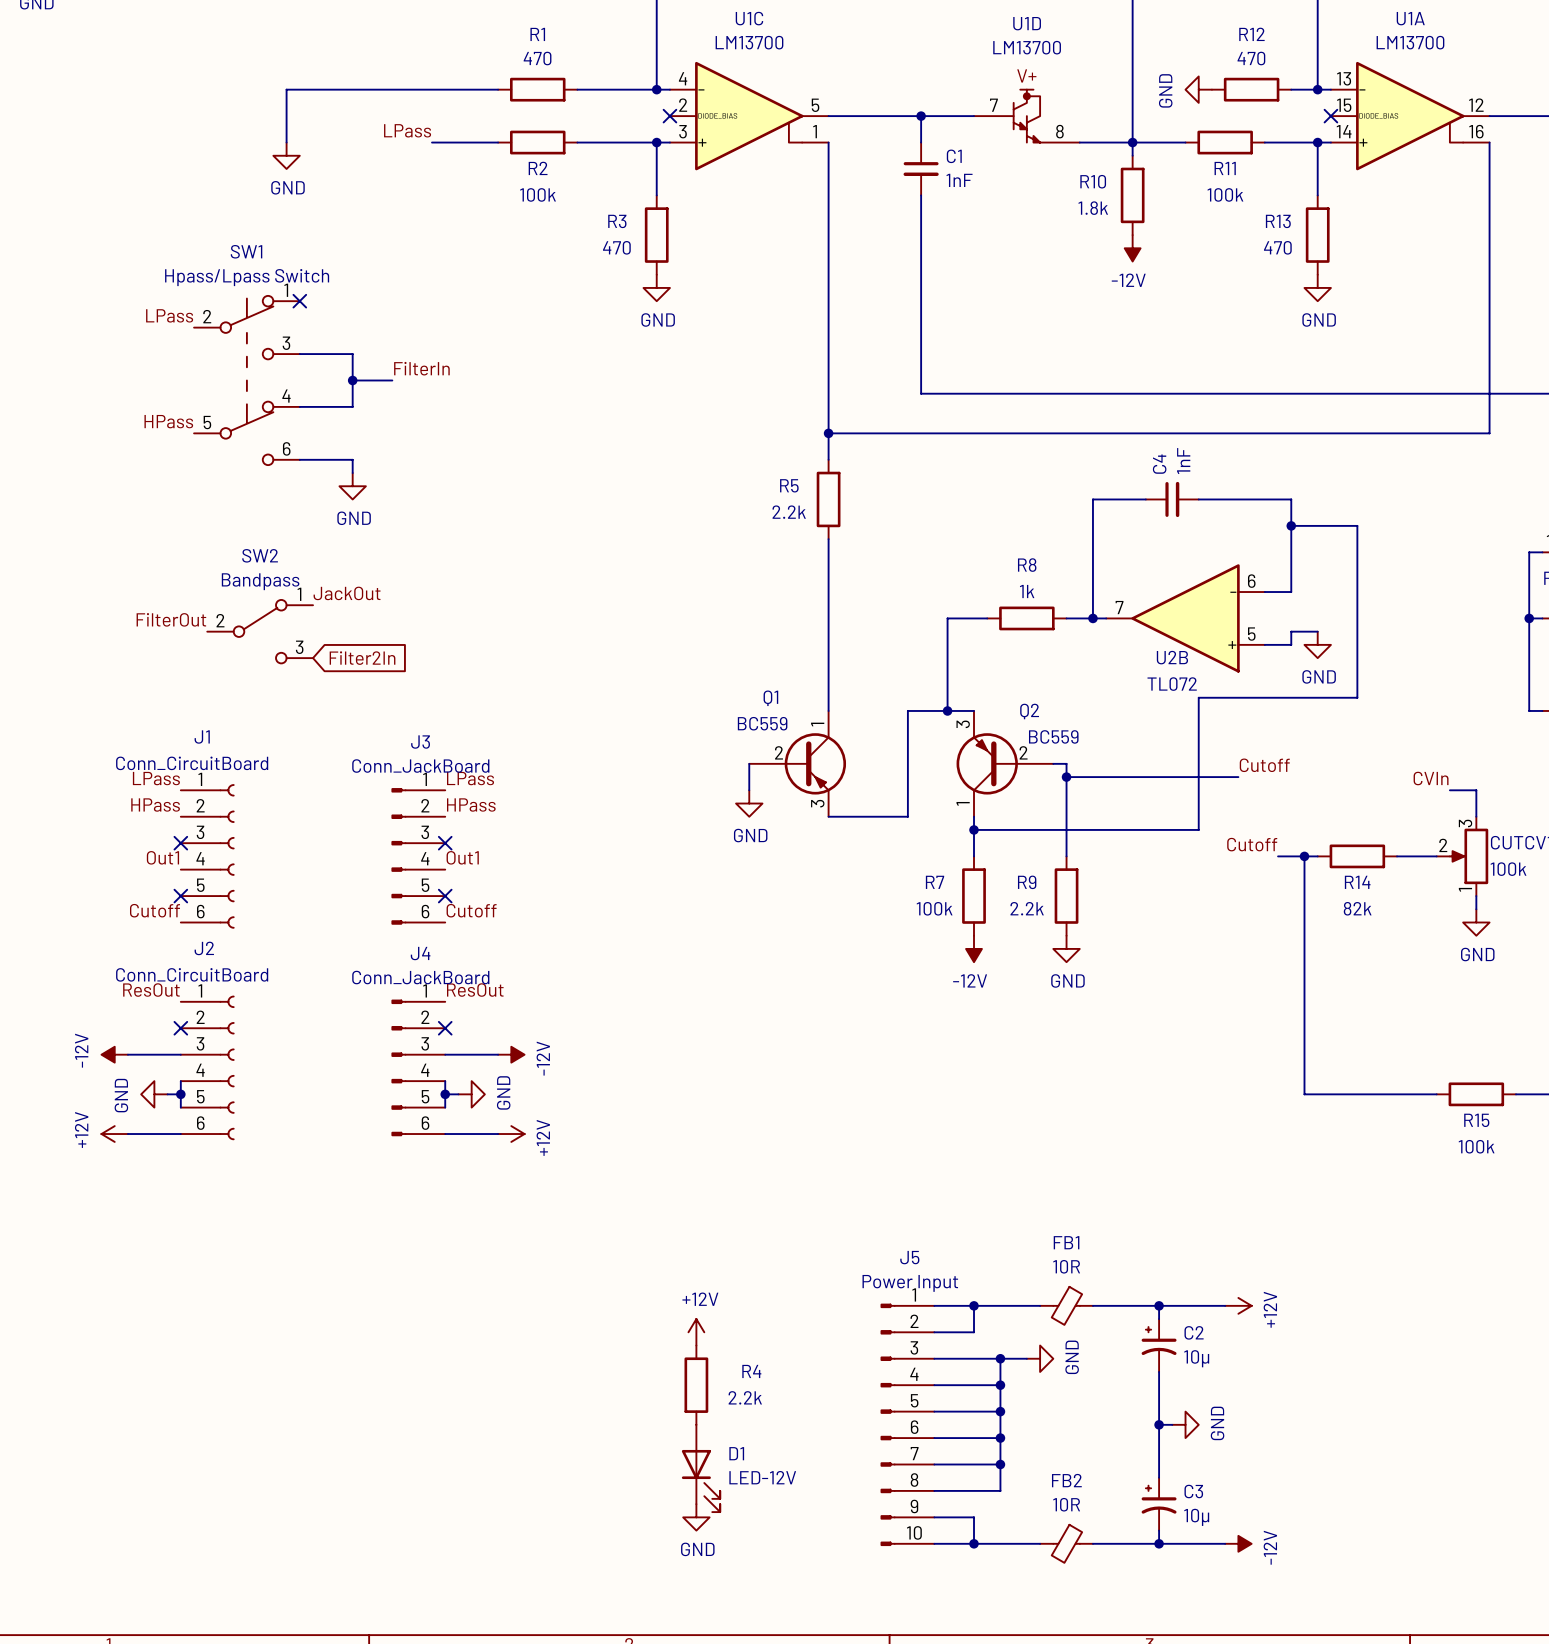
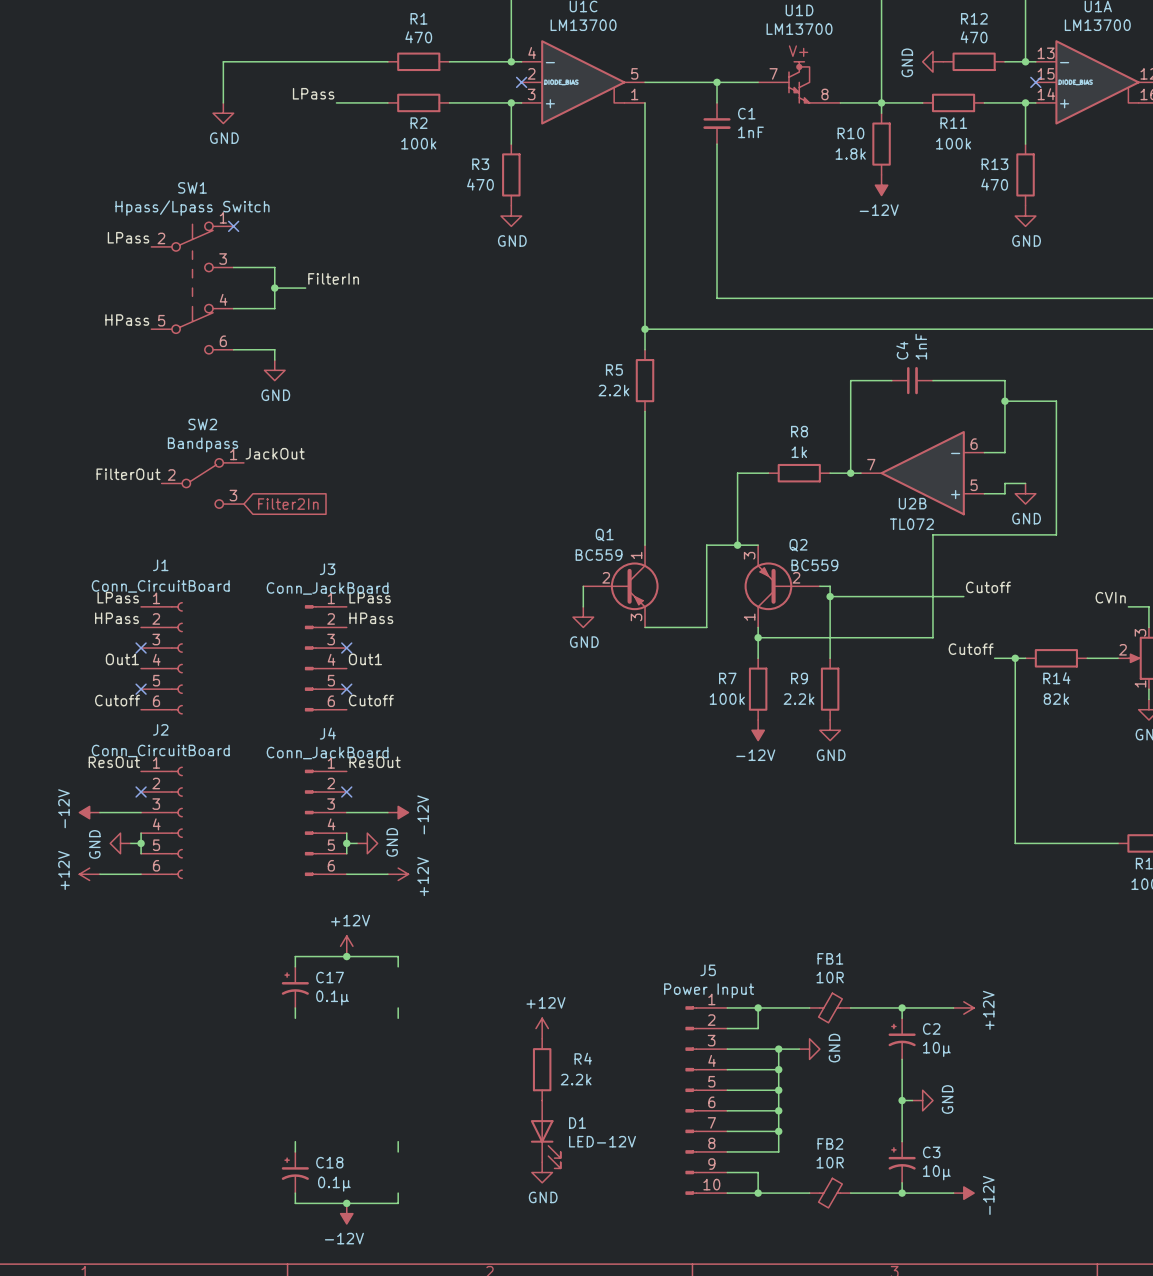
power symbol: none -> +12V (346, 946)
junction: none -> (346, 956)
wire: none -> (295, 966) (295, 956) (398, 956) (398, 966)
C17: none -> 0.1µ (295, 987)
wire: none -> (295, 1007) (295, 1018)
wire: none -> (398, 1007) (398, 1018)
wire: none -> (295, 1141) (295, 1151)
wire: none -> (398, 1141) (398, 1151)
C18: none -> 0.1µ (295, 1172)
wire: none -> (295, 1193) (295, 1203) (398, 1203) (398, 1193)
junction: none -> (346, 1203)
power symbol: none -> -12V (346, 1213)

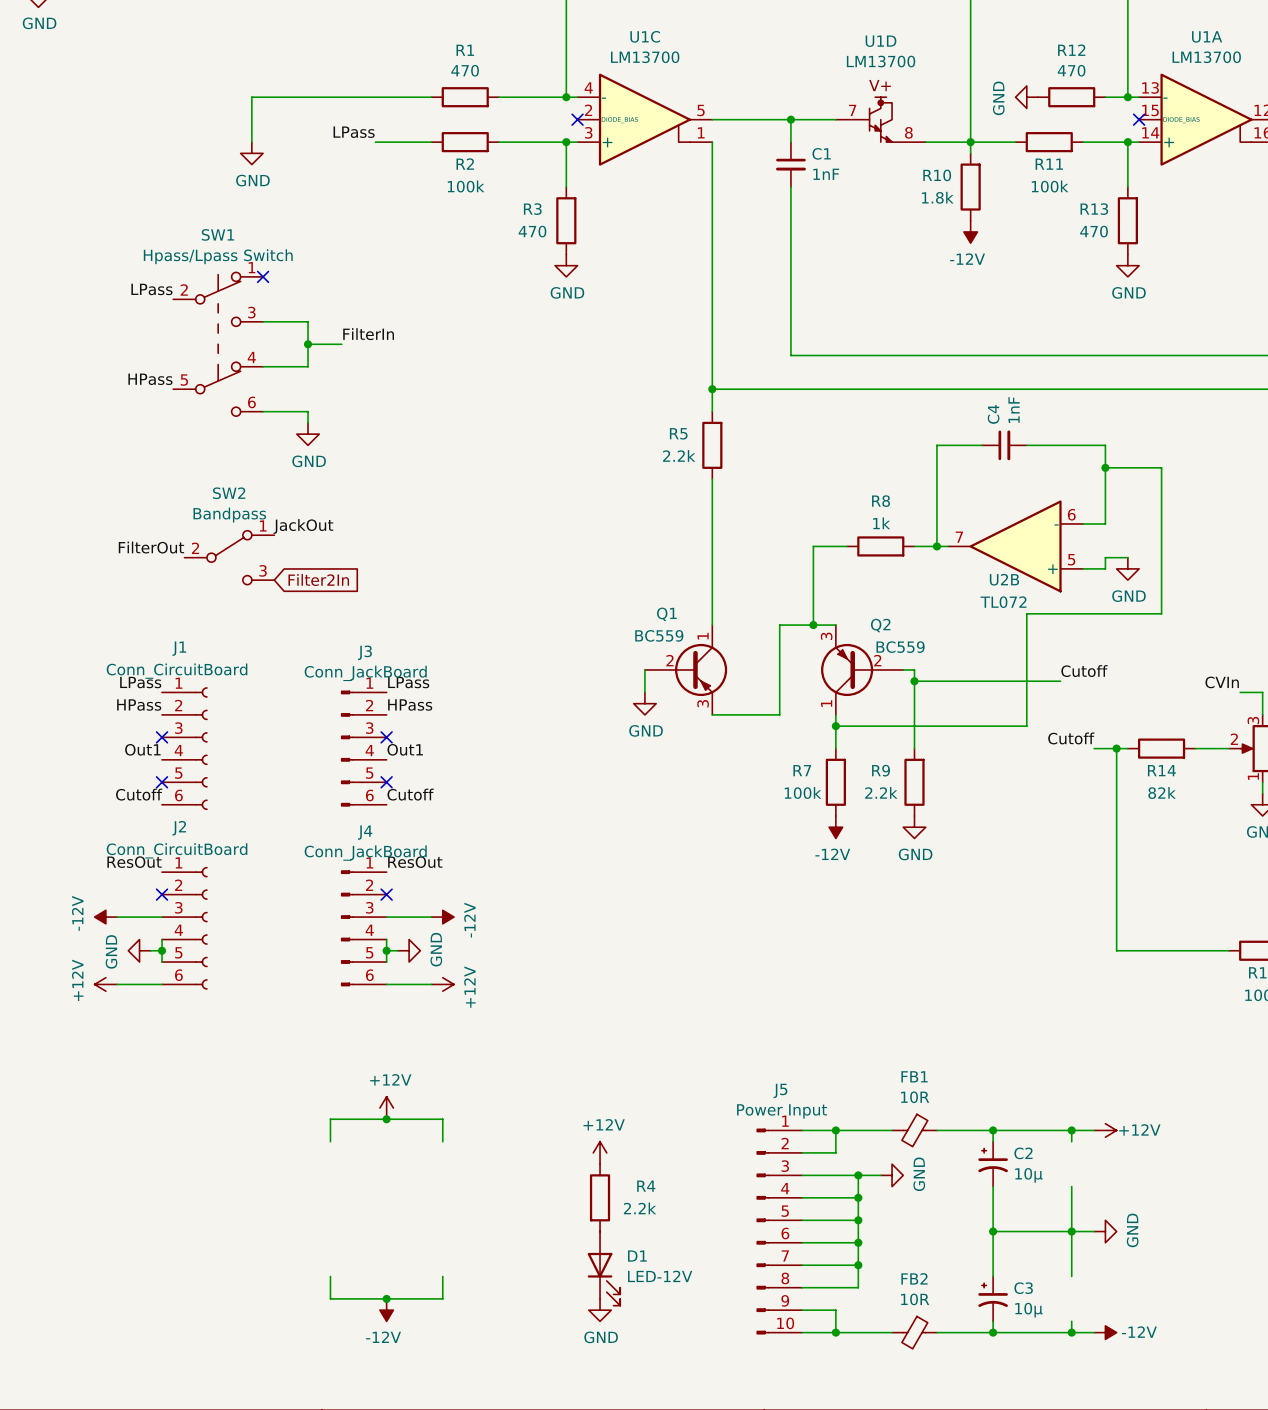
power symbol position: +12V (346, 946) -> +12V (386, 1107)
junction position: (346, 956) -> (386, 1119)
wire: (295, 966) (295, 956) (398, 956) (398, 966) -> (330, 1130) (330, 1119) (442, 1119) (442, 1130)
C17: 0.1µ (295, 987) -> none
power symbol position: +12V (963, 1007) -> +12V (1105, 1130)
wire: none -> (1071, 1130) (1071, 1141)
junction: none -> (1071, 1130)
power symbol text rotation: 0° (988, 1010) -> 90° clockwise (1139, 1129)
wire: none -> (1071, 1186) (1071, 1276)
wire: none -> (1004, 1231) (1094, 1231)
power symbol position: GND (922, 1100) -> GND (1105, 1231)
junction: none -> (1071, 1231)
C18: 0.1µ (295, 1172) -> none
wire: none -> (1071, 1321) (1071, 1332)
wire: (295, 1193) (295, 1203) (398, 1203) (398, 1193) -> (330, 1287) (330, 1298) (442, 1298) (442, 1287)
power symbol position: -12V (963, 1193) -> -12V (1105, 1332)
junction: none -> (1071, 1332)
power symbol text rotation: 0° (988, 1195) -> 90° clockwise (1139, 1332)
junction position: (346, 1203) -> (386, 1298)
power symbol position: -12V (346, 1213) -> -12V (386, 1310)

